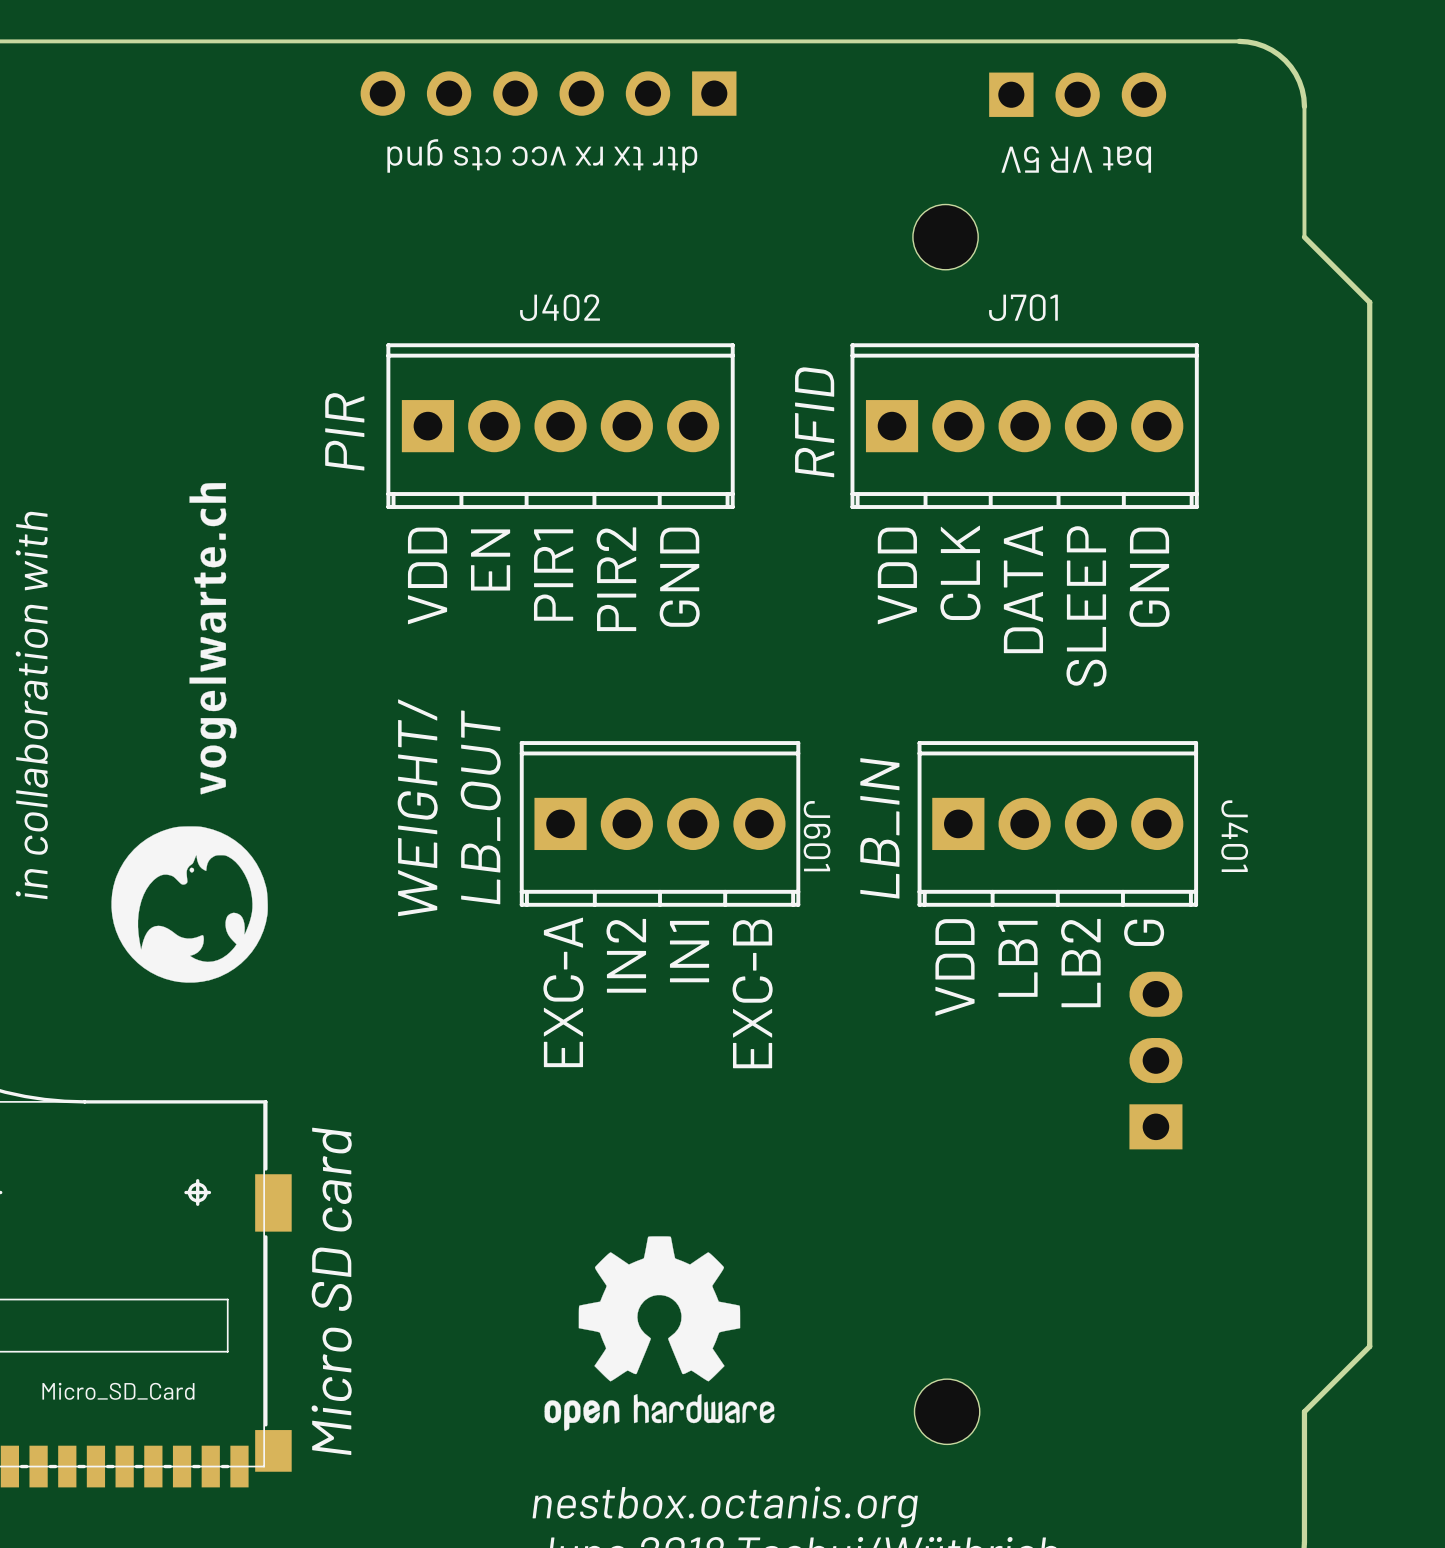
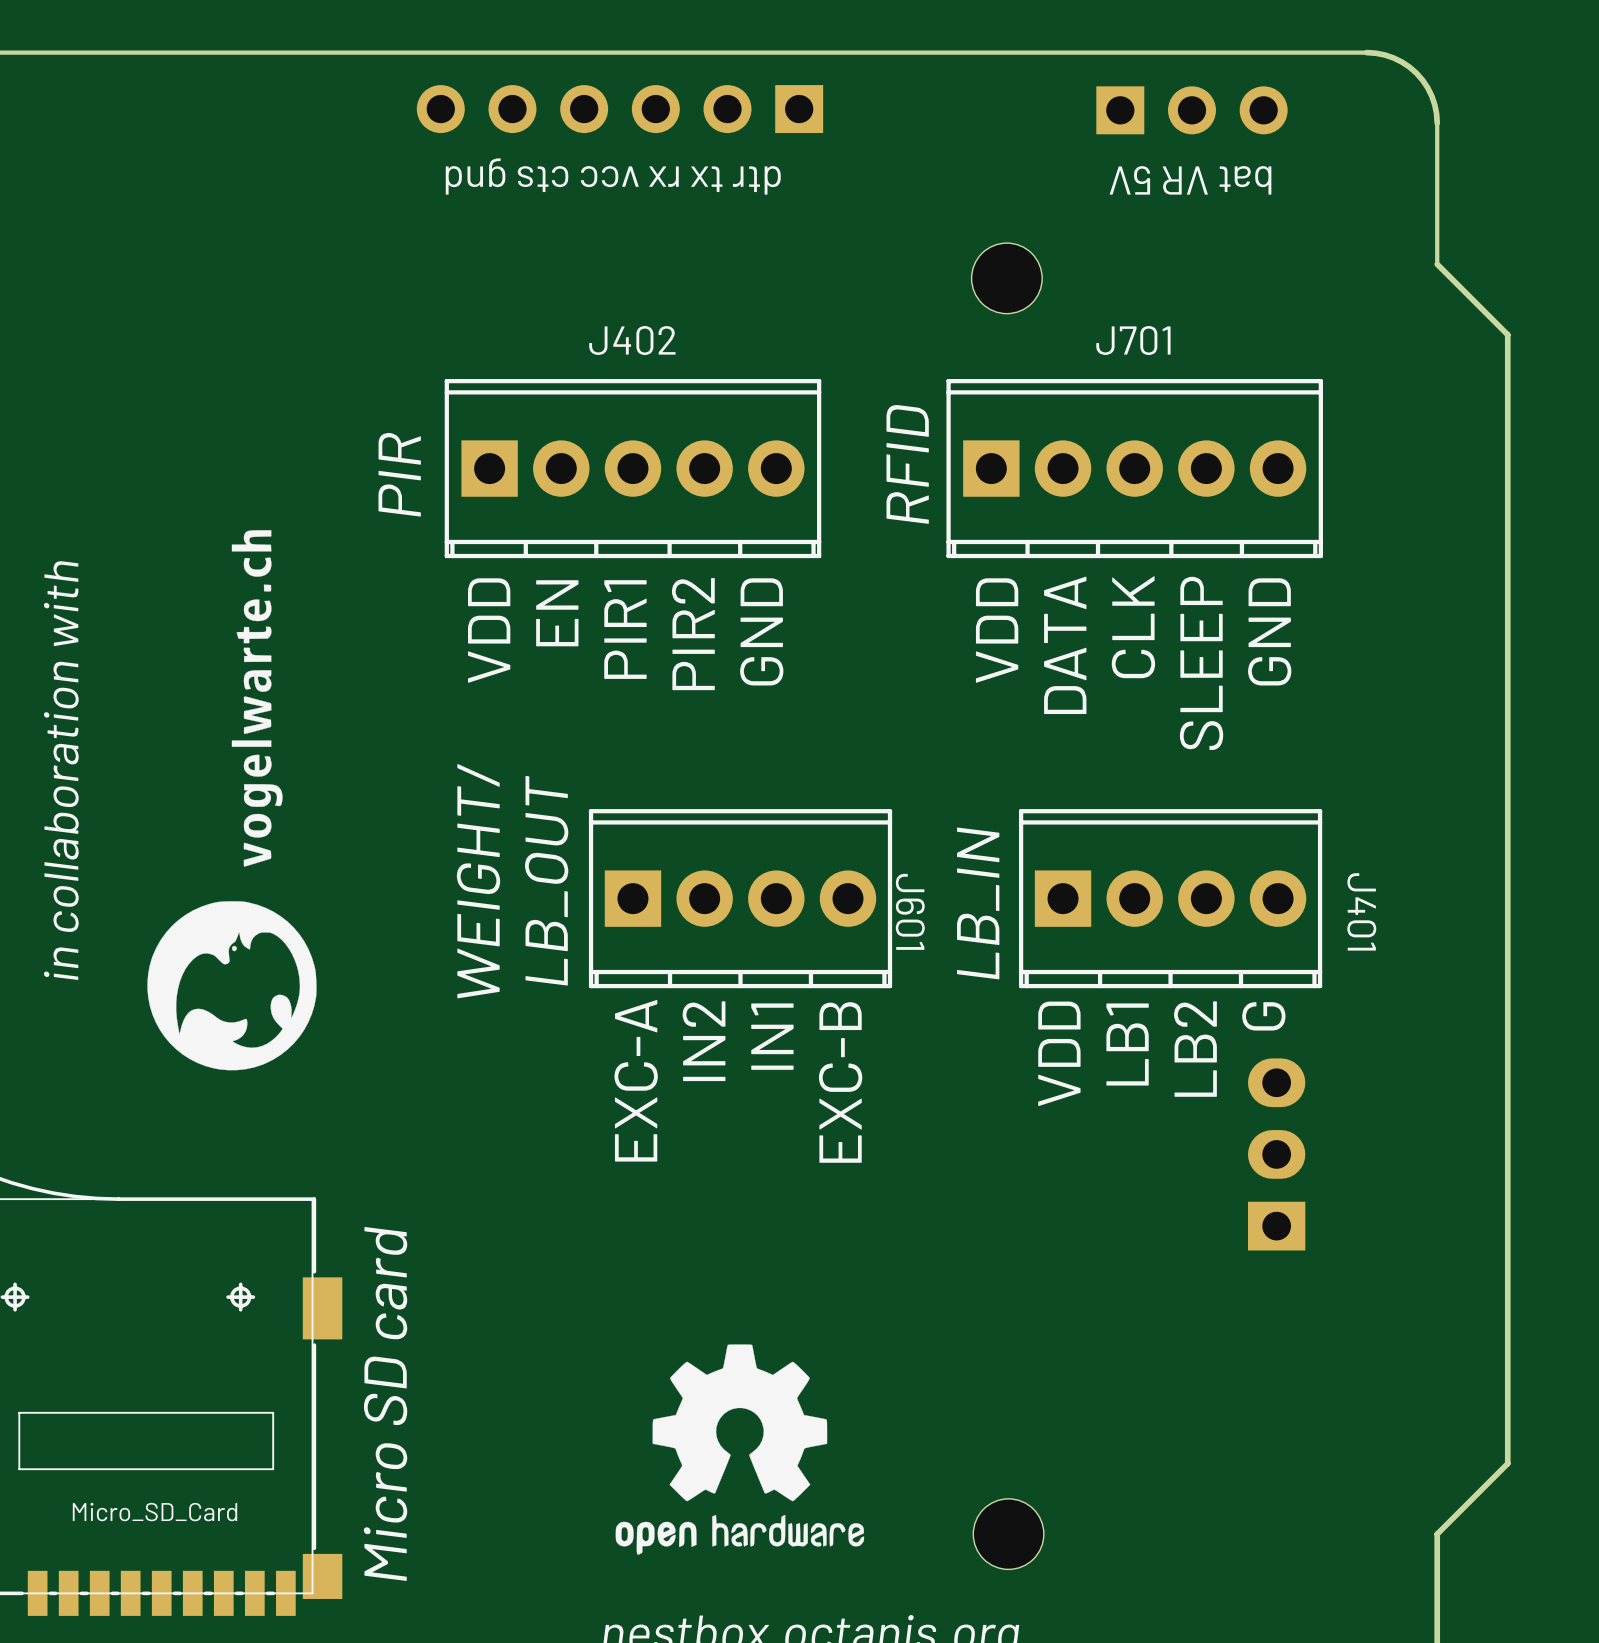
part position: (945, 237) -> (1006, 278)
text: CLK (960, 572) -> DATA (1065, 645)
text: DATA (1023, 589) -> CLK (1133, 627)
part position: (947, 1411) -> (1008, 1534)

